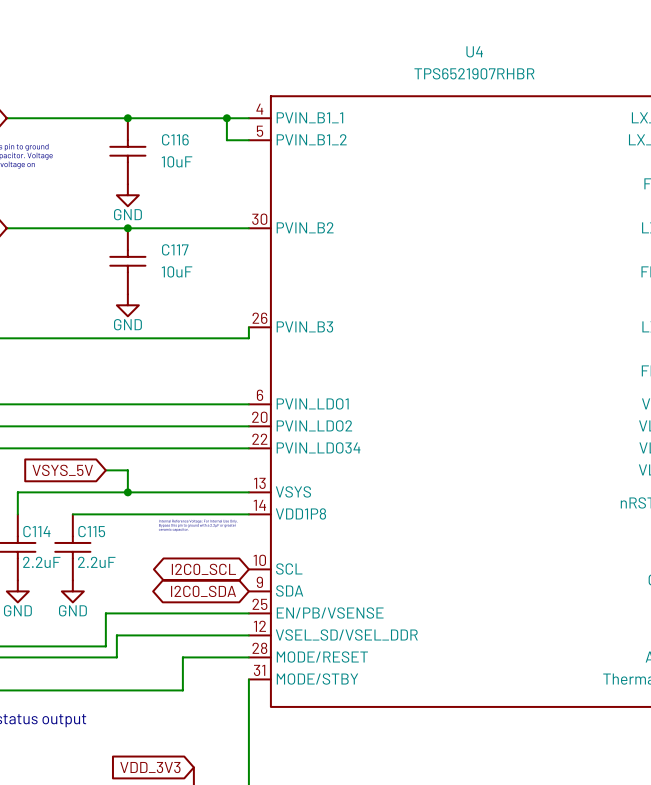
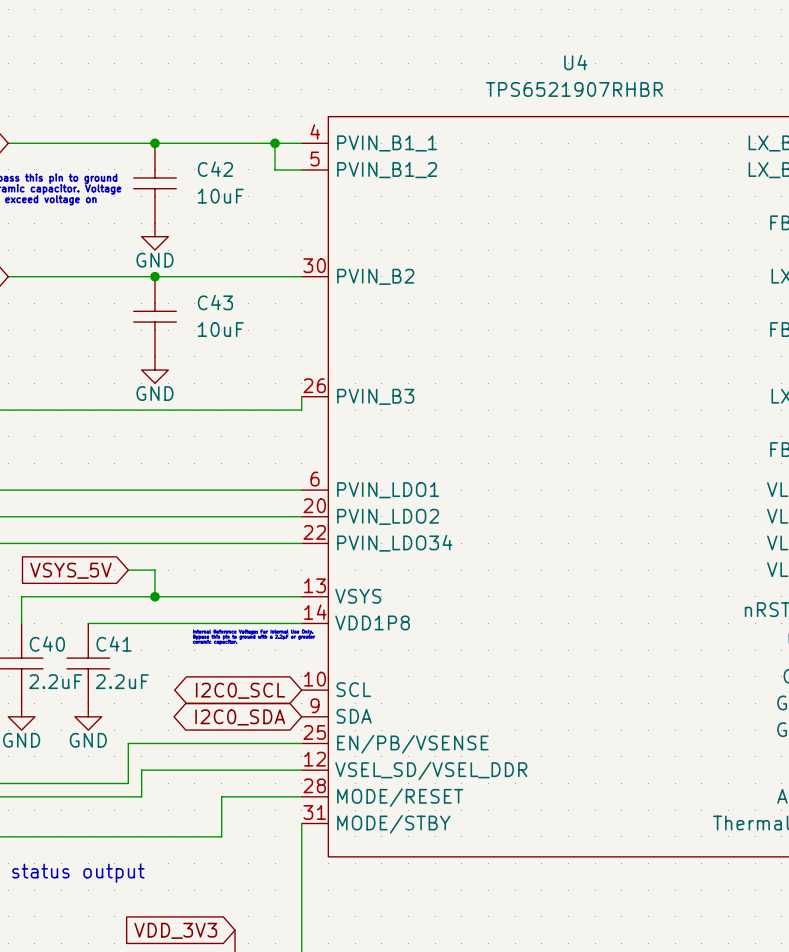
C116 name: C116 (175, 139) -> C42 (215, 169)
C117 name: C117 (175, 249) -> C43 (215, 302)
C114 name: C114 (36, 531) -> C40 (47, 643)
C115 name: C115 (91, 531) -> C41 (114, 643)

